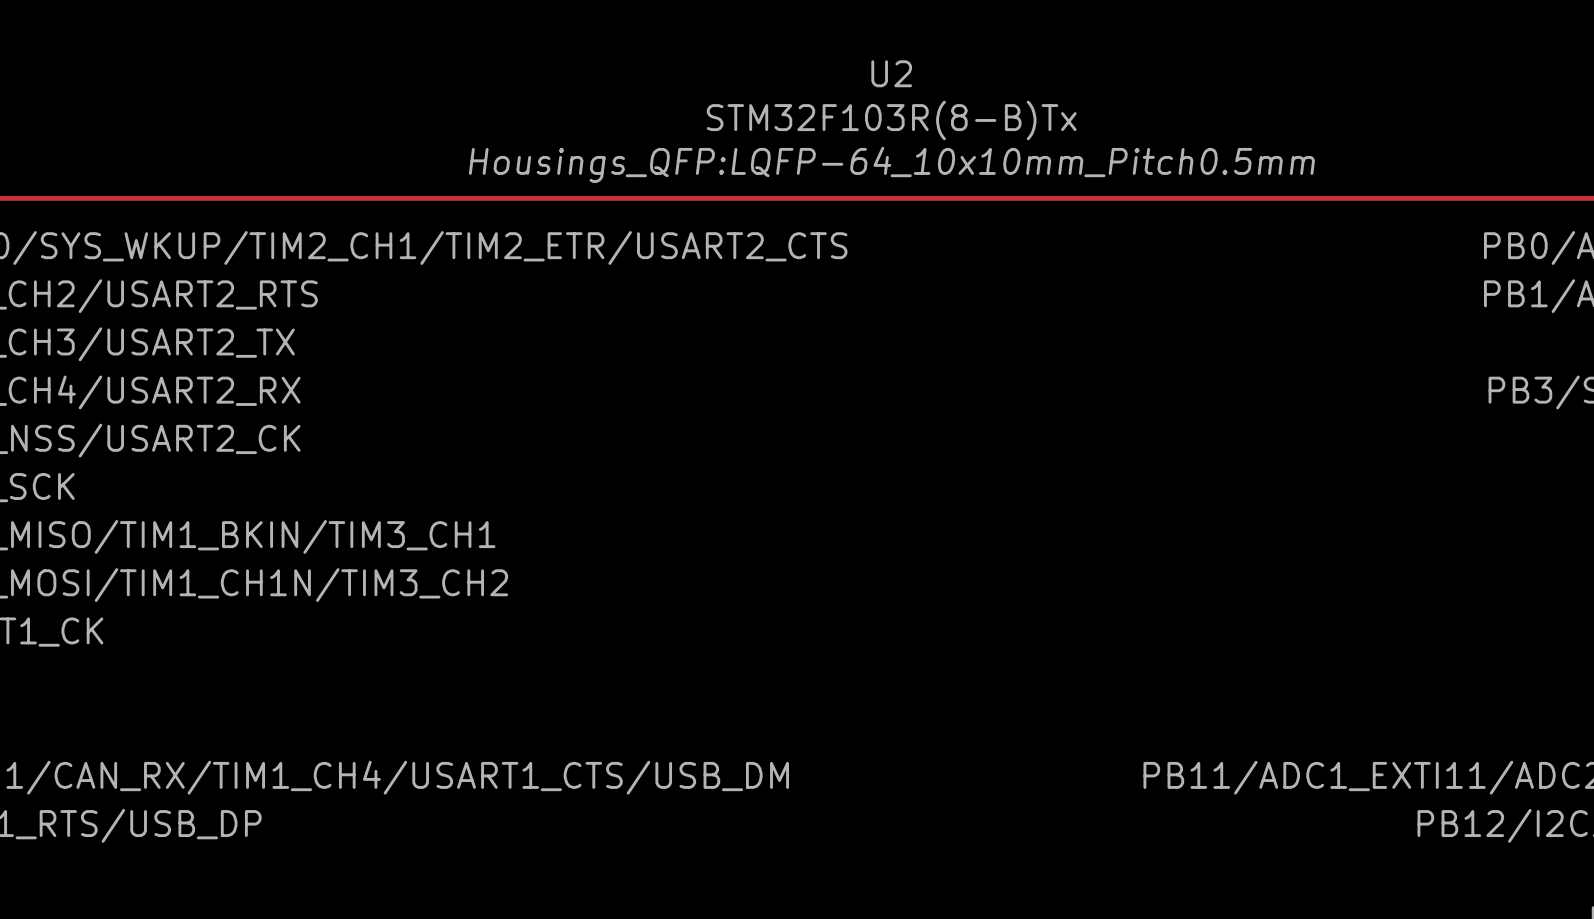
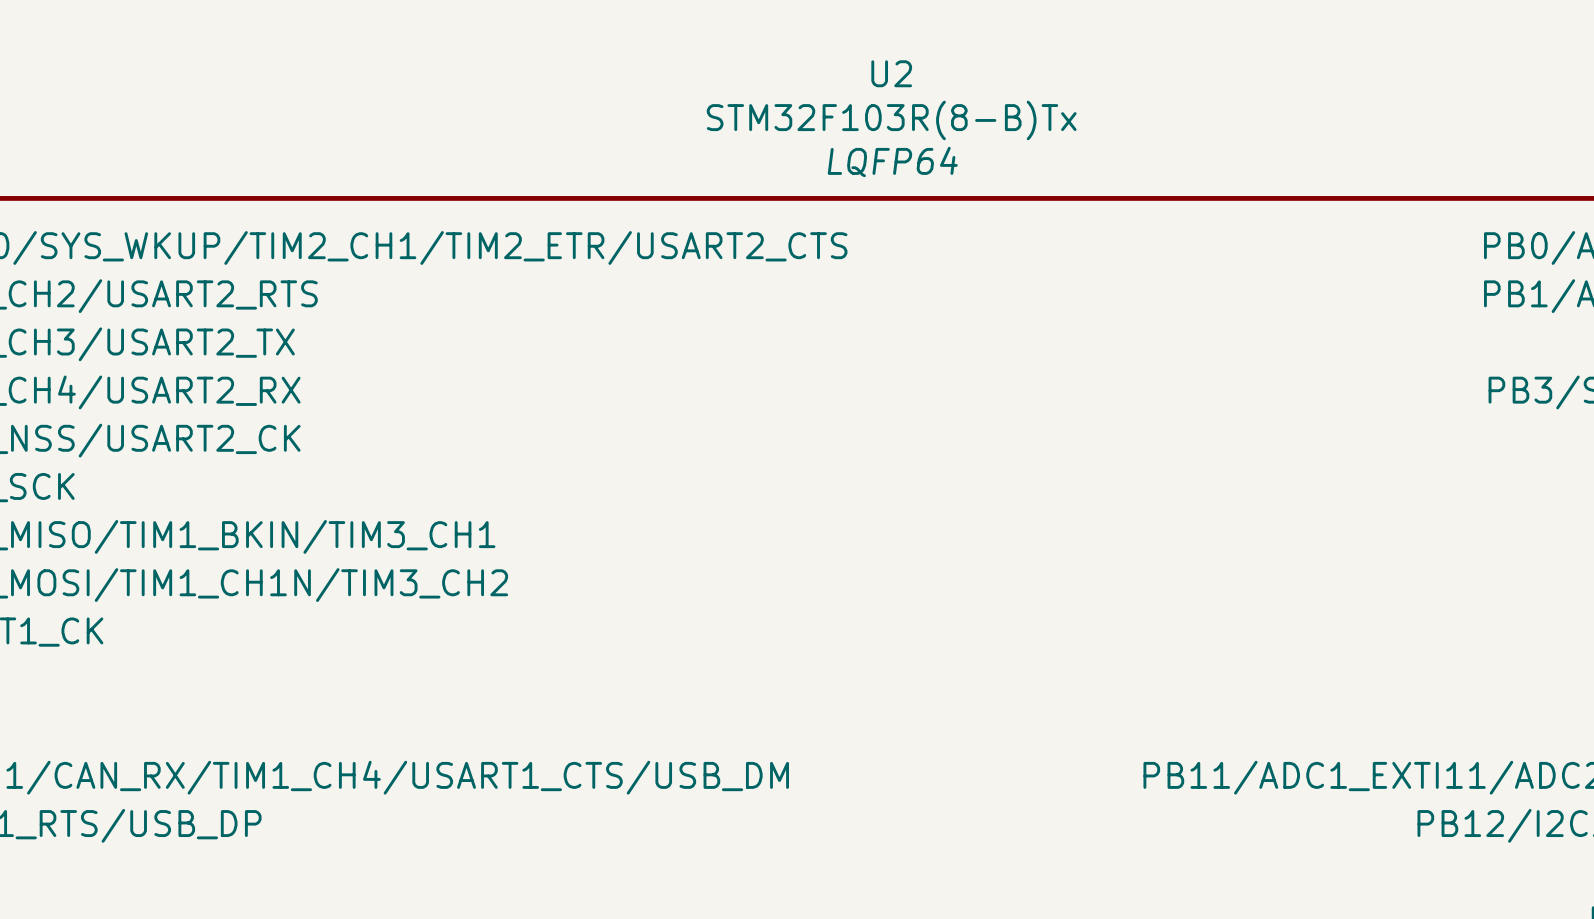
U2 text: Housings_QFP:LQFP-64_10x10mm_Pitch0.5mm (891, 164) -> LQFP64 (892, 161)

